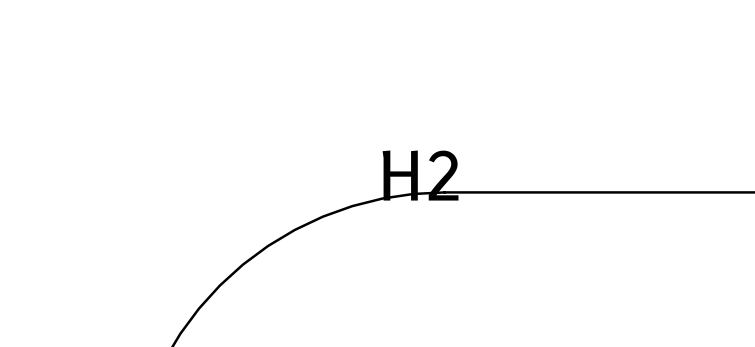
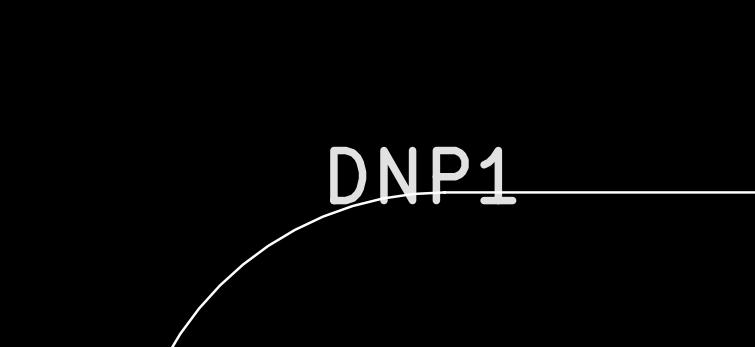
H2 name: H2 (420, 175) -> DNP1 (423, 175)

